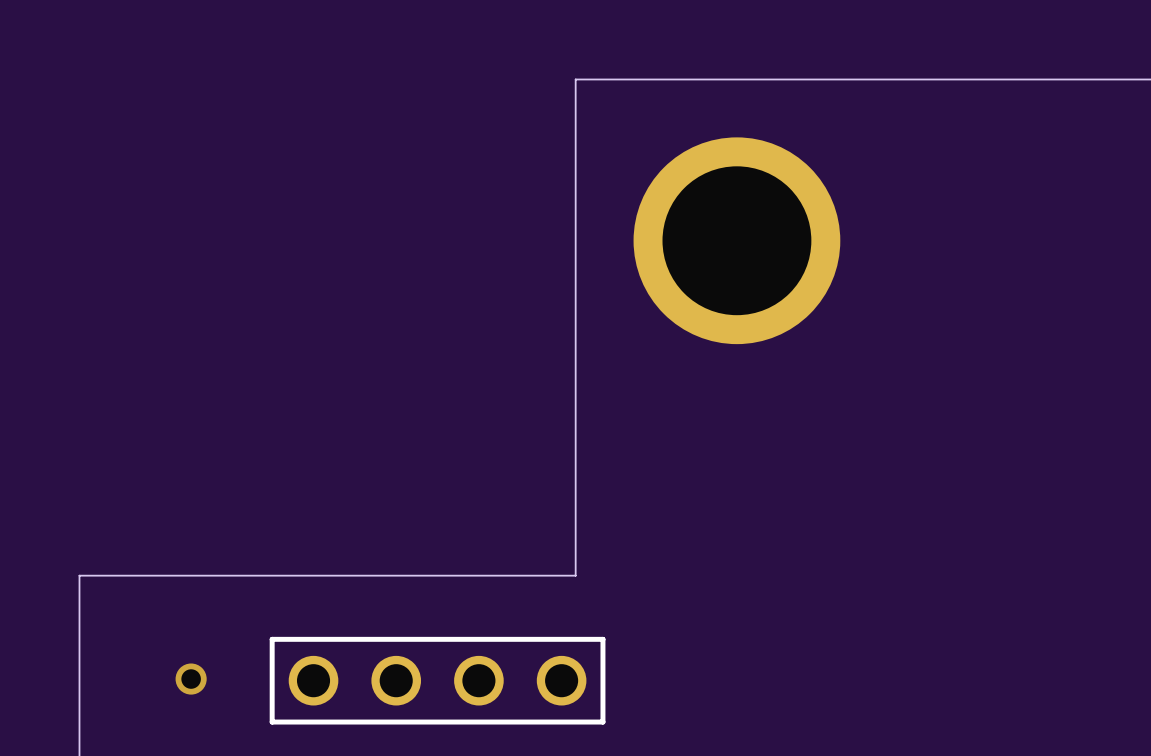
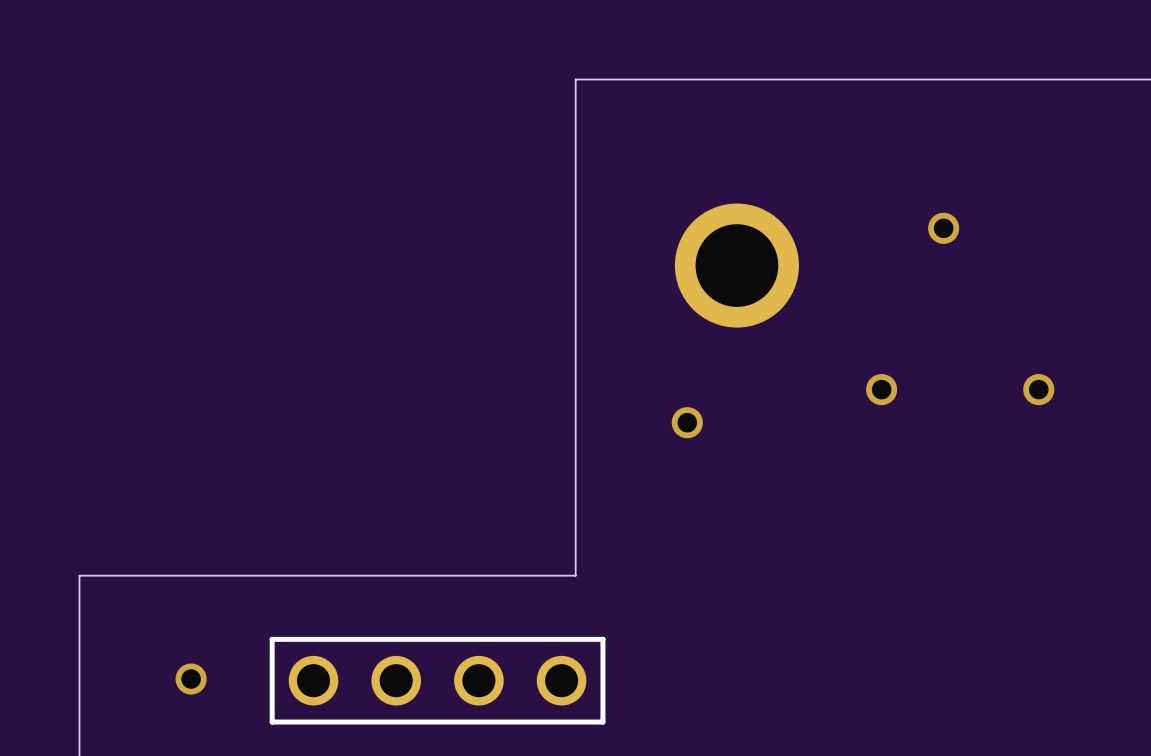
part footprint: [633, 137, 841, 345] -> [674, 203, 799, 328]
via: none -> (943, 228)
via: none -> (881, 389)
via: none -> (1038, 389)
via: none -> (687, 422)

